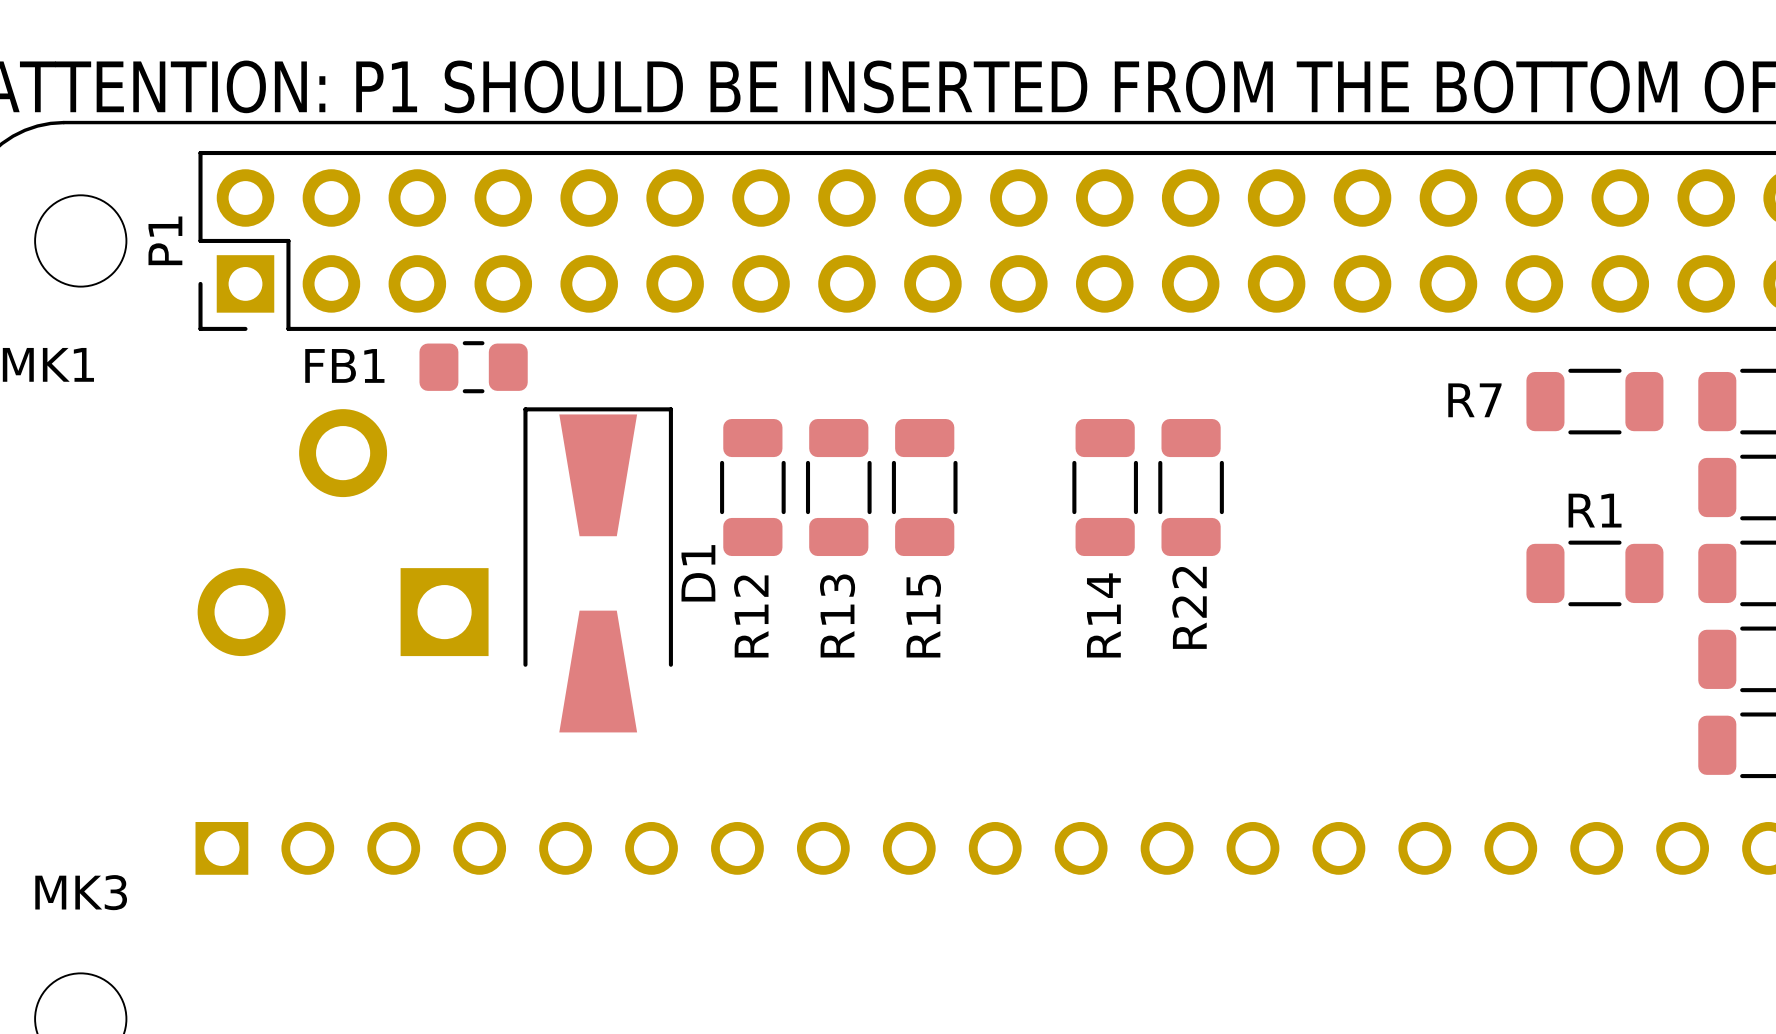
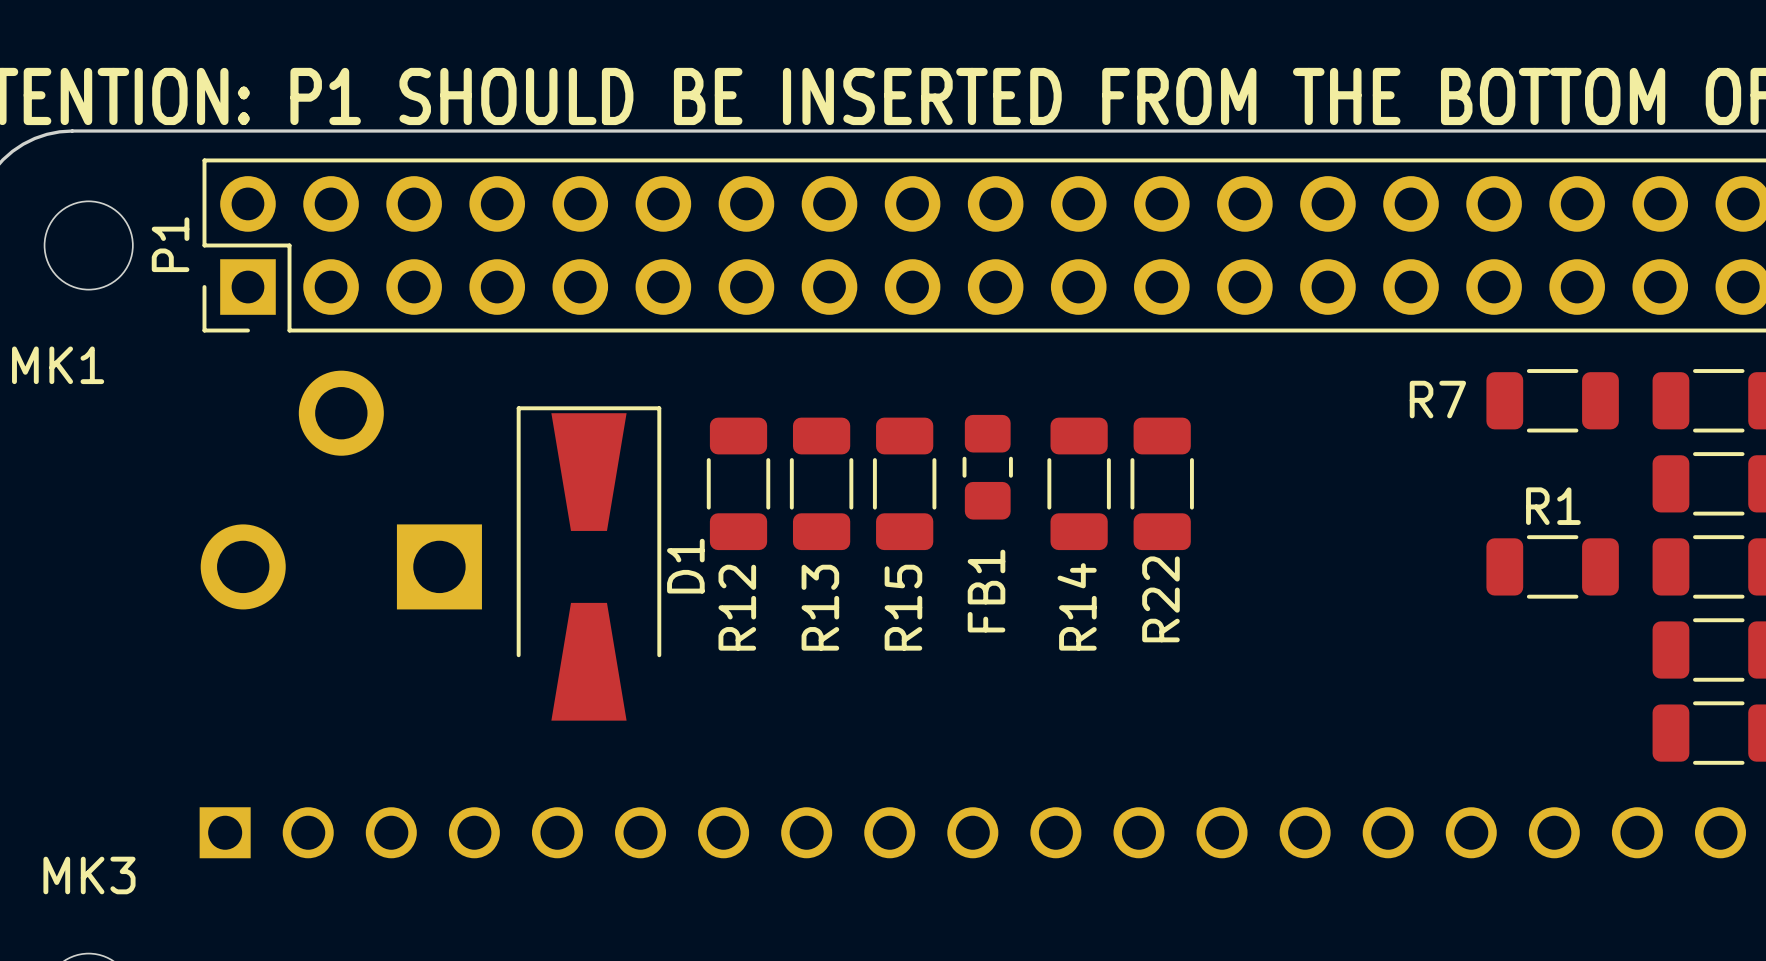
FB1 name position: FB1 (344, 365) -> FB1 (986, 591)
FB1 rotation: 0° (473, 367) -> 90° clockwise (987, 467)
FB1 position: (473, 367) -> (987, 467)
part position: (343, 532) -> (341, 490)

